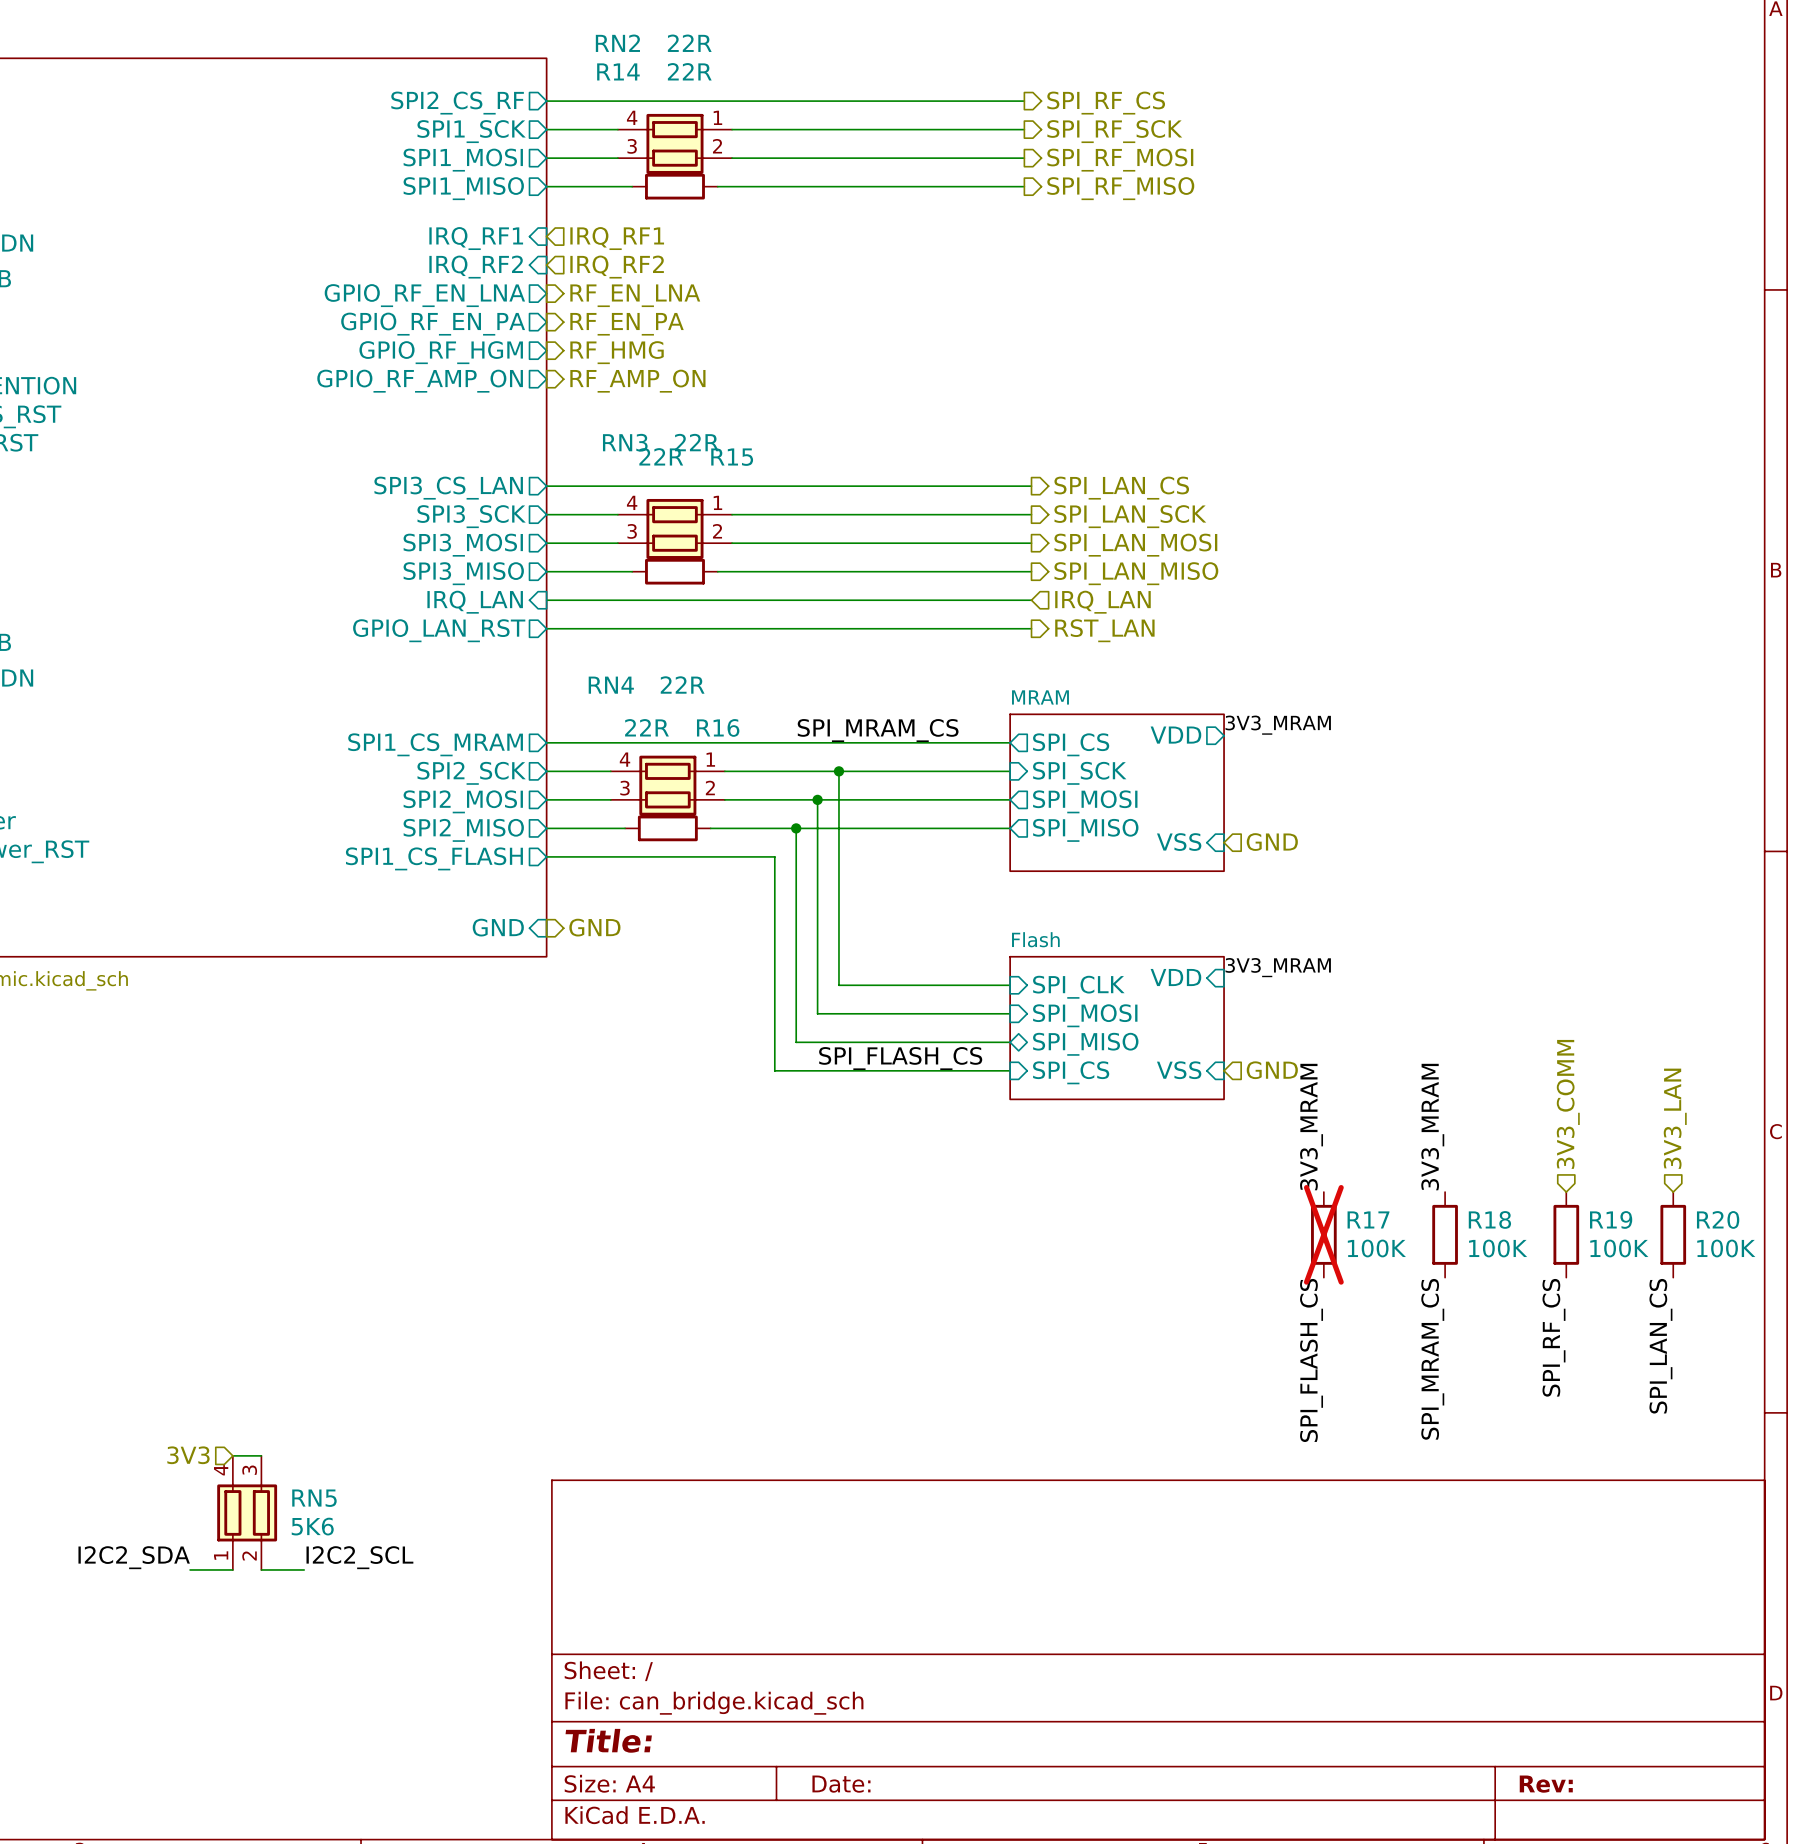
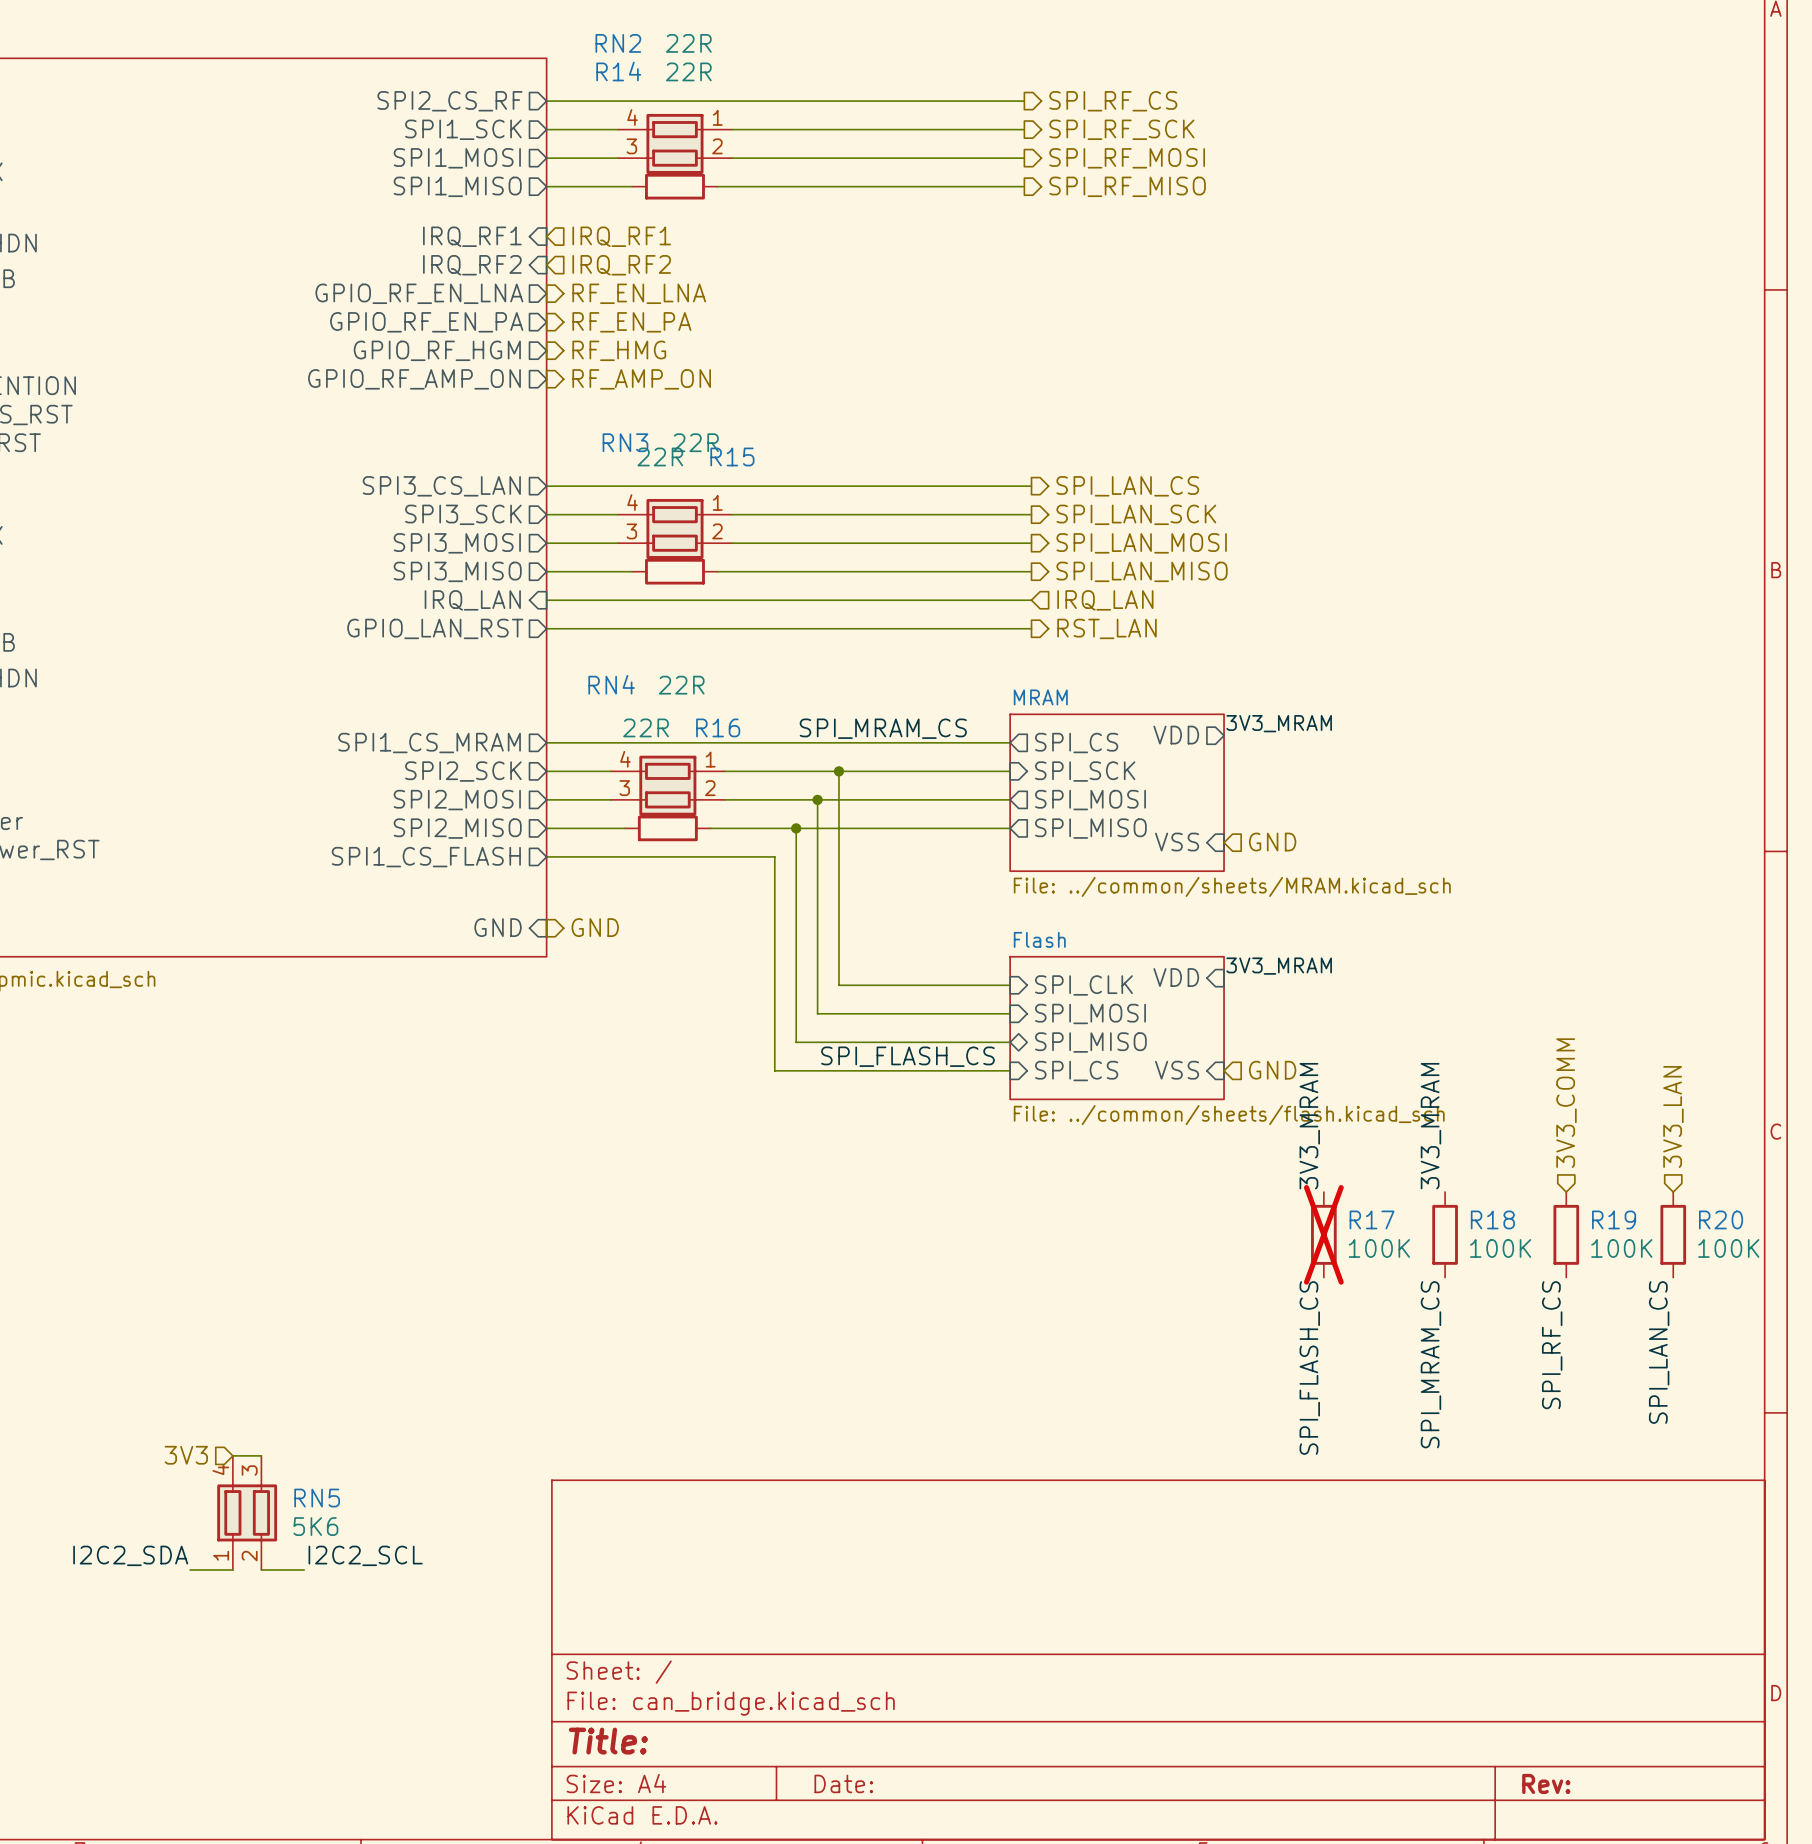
sheet MRAM value: none -> File: ../common/sheets/MRAM.kicad_sch (1232, 886)
sheet Flash value: none -> File: ../common/sheets/flash.kicad_sch (1229, 1115)

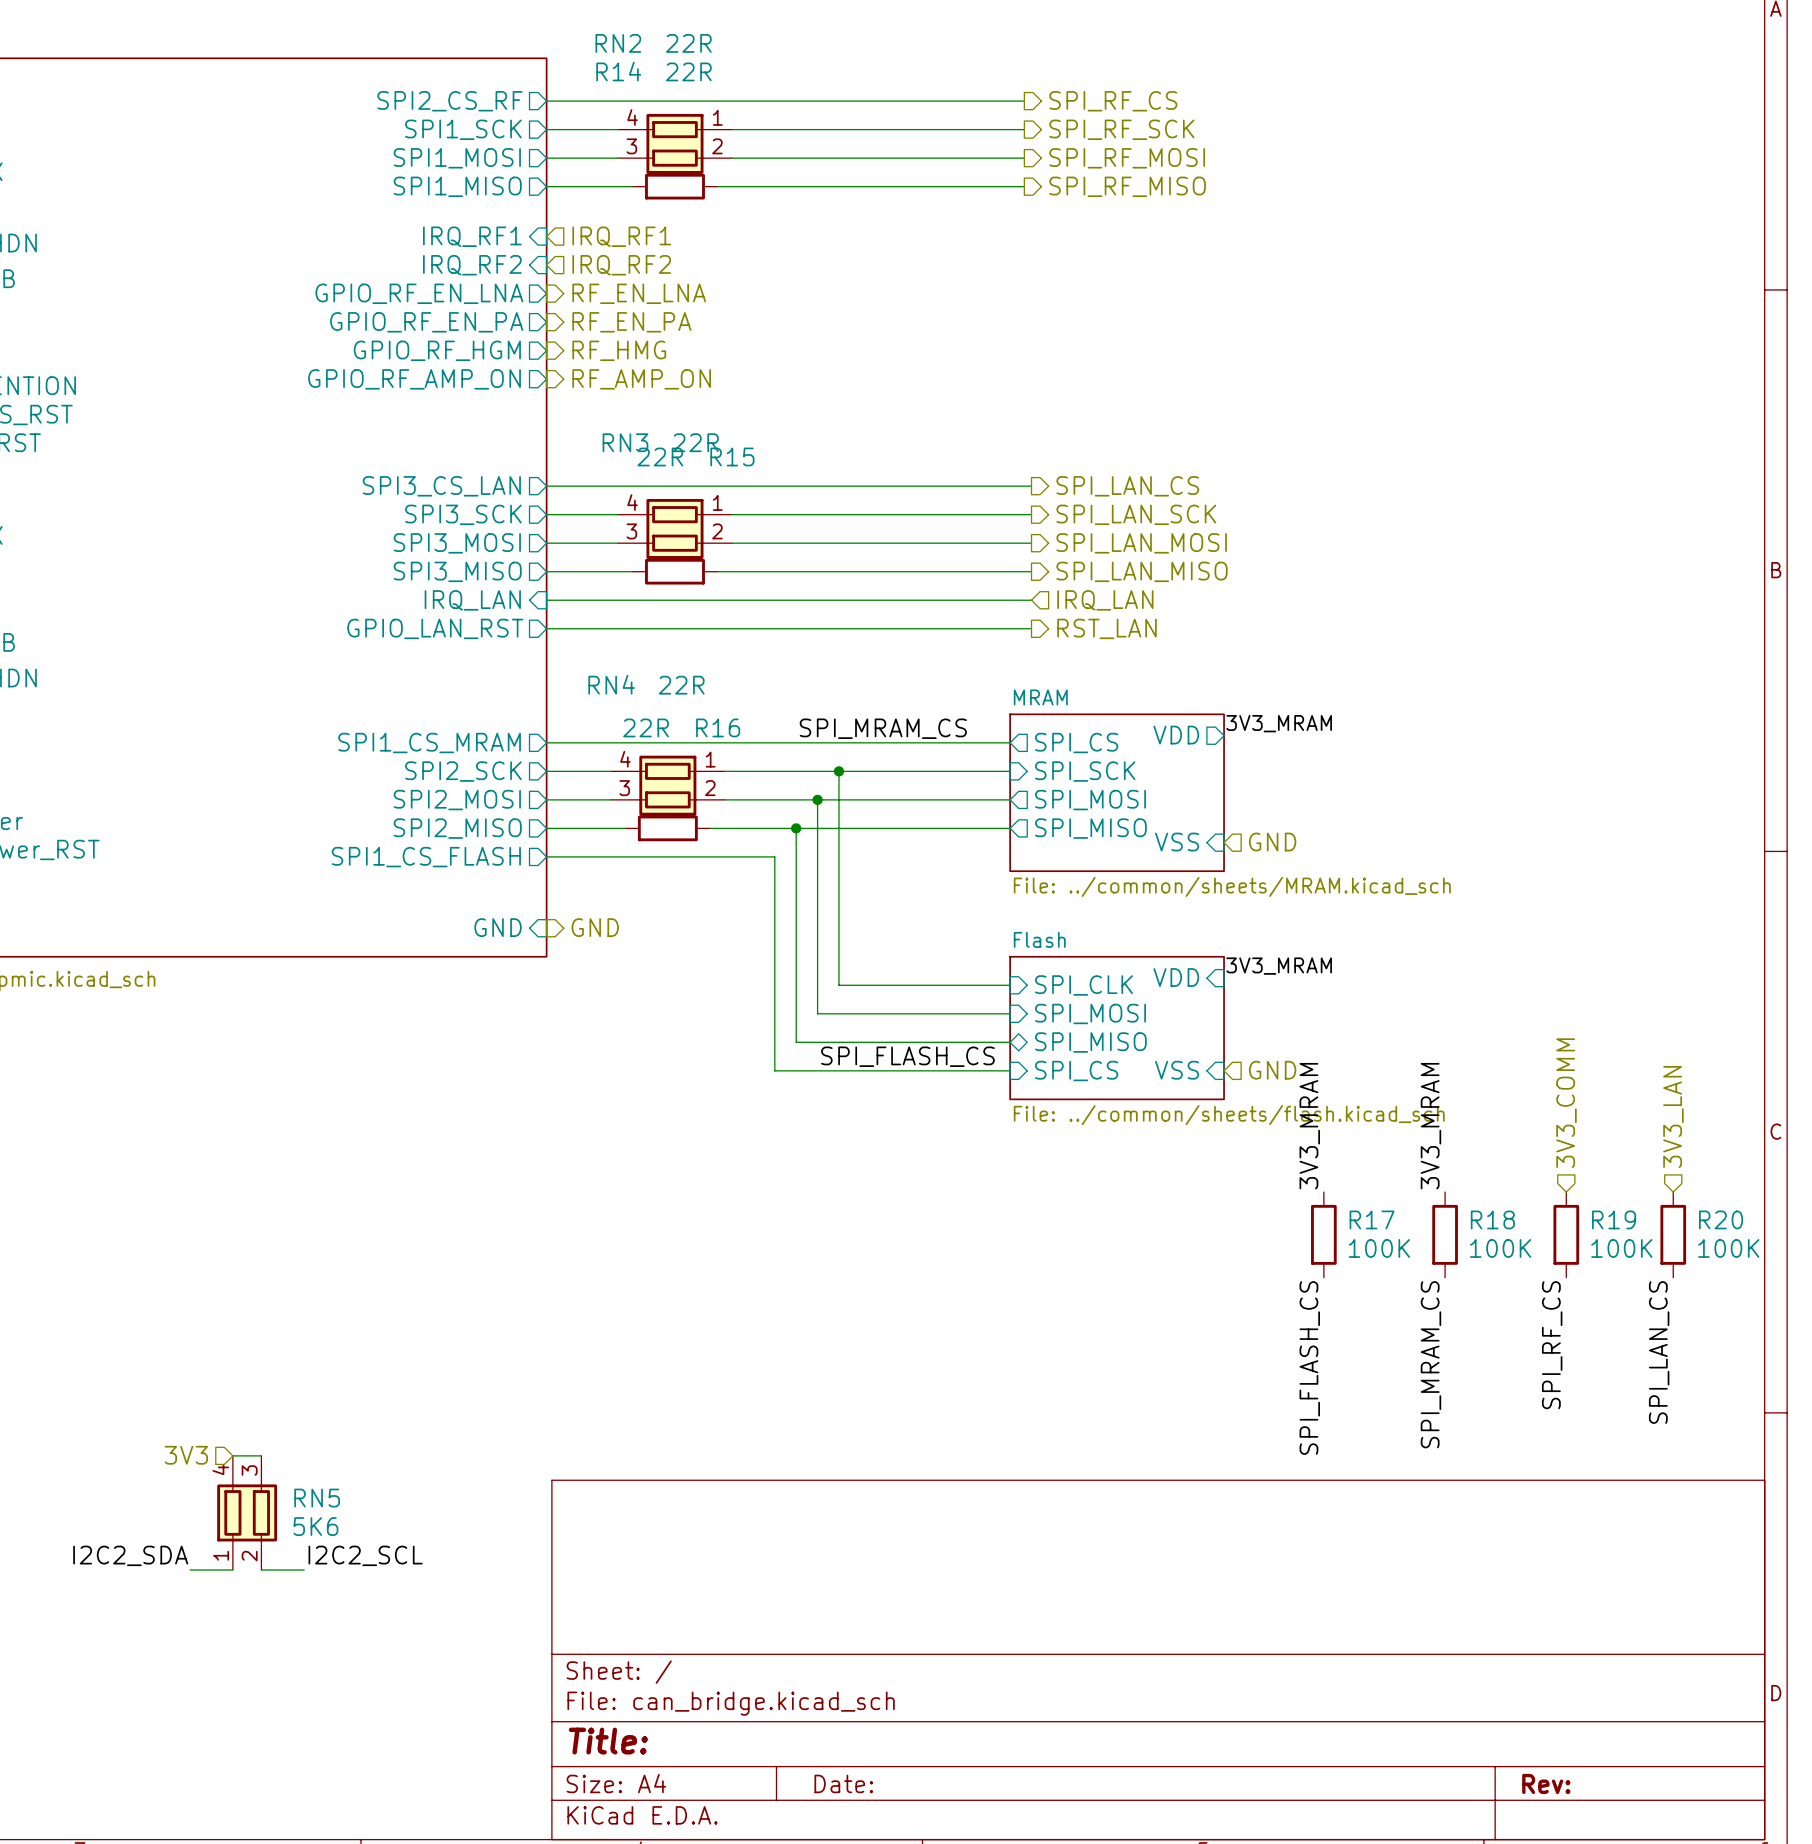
R17 do-not-place cross: (1323, 1234) -> none

